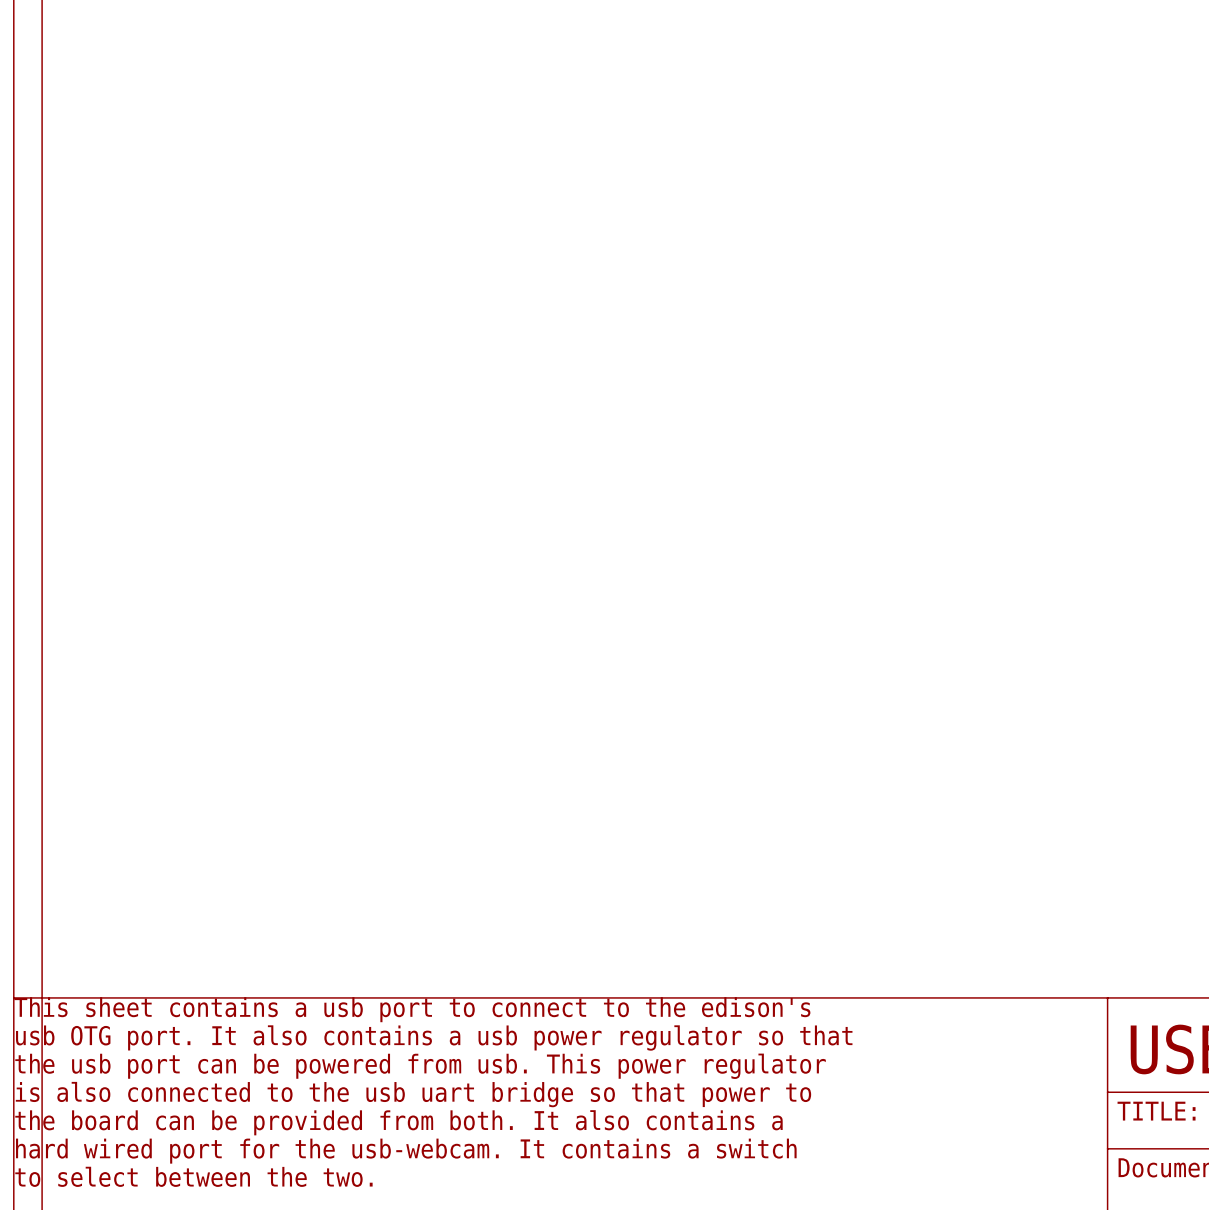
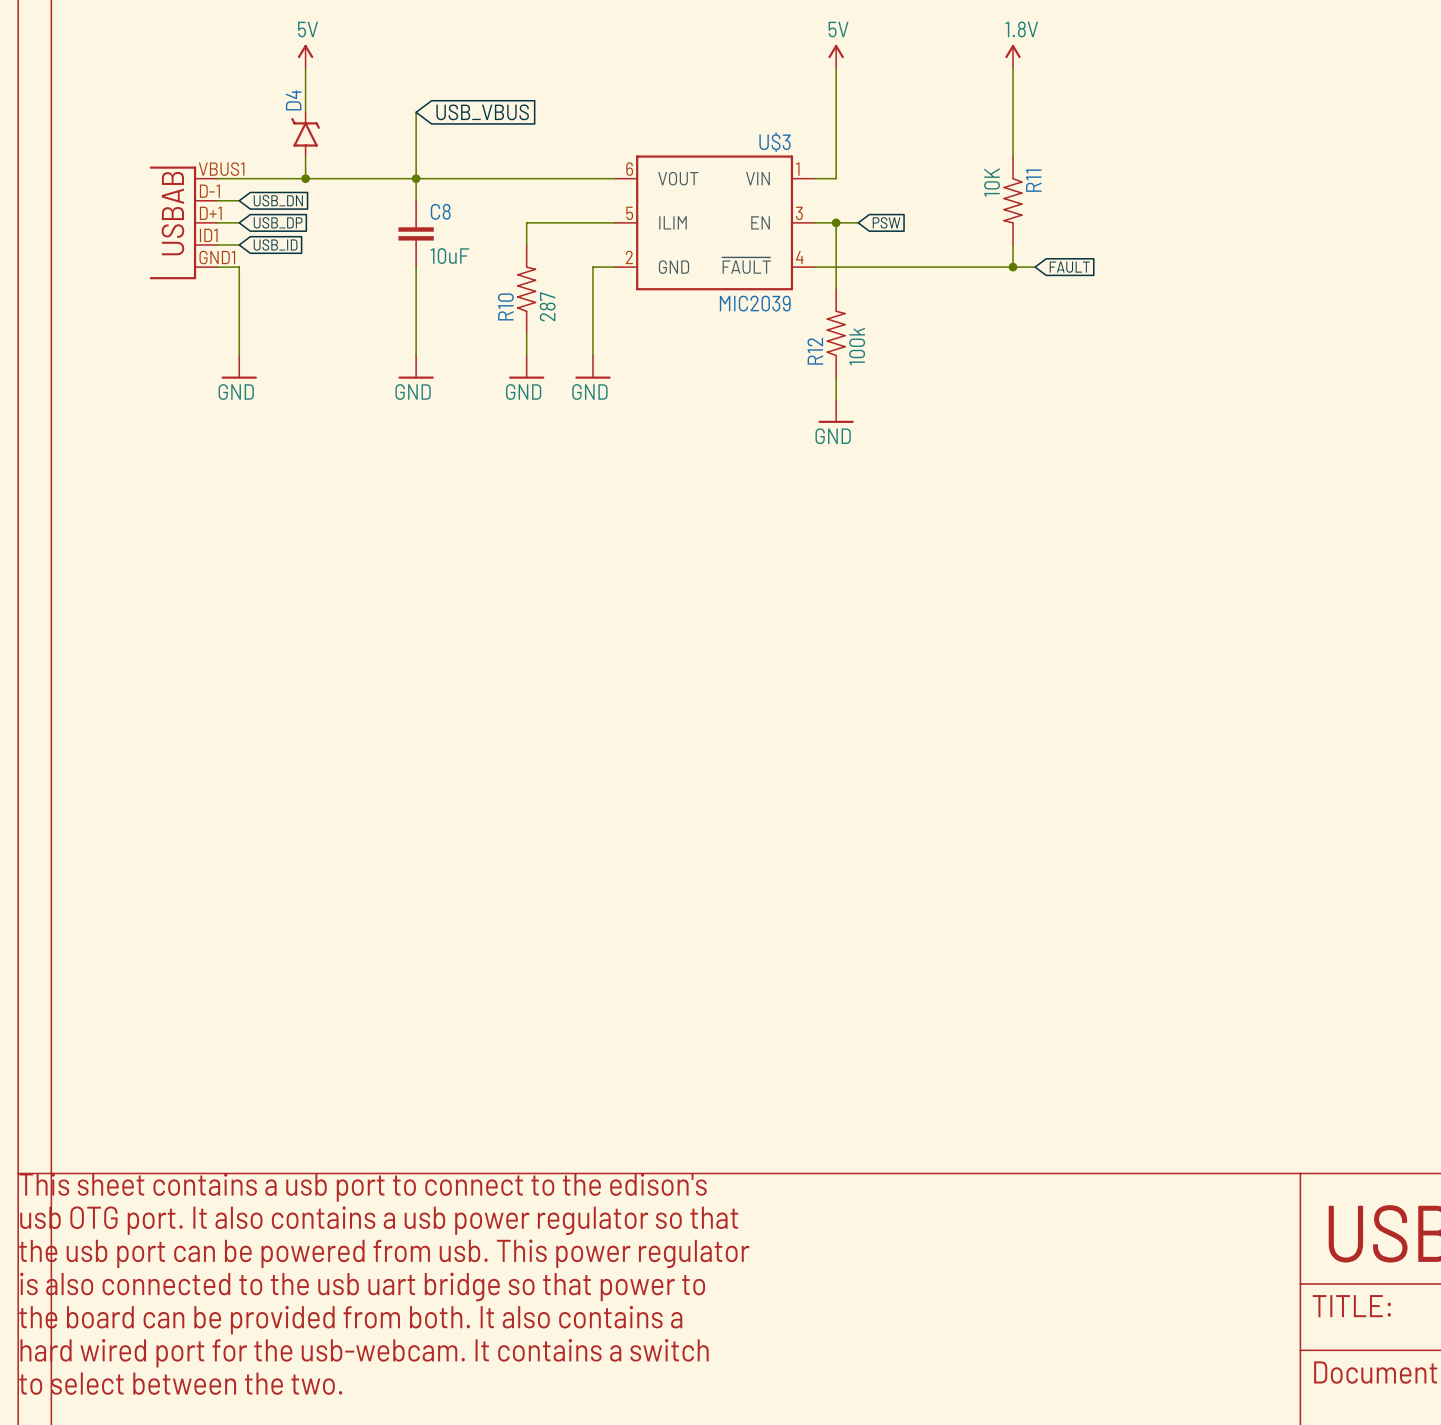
power symbol: none -> 5V (305, 56)
power symbol: none -> 5V (836, 56)
power symbol: none -> 1.8V (1013, 56)
wire: none -> (305, 68) (305, 112)
wire: none -> (836, 68) (836, 178) (814, 178)
wire: none -> (1013, 68) (1013, 156)
wire: none -> (416, 112) (416, 200)
global label: none -> USB_VBUS (482, 112)
D4: none -> (305, 134)
wire: none -> (305, 156) (305, 178)
wire: none -> (217, 178) (615, 178)
junction: none -> (305, 178)
junction: none -> (416, 178)
wire: none -> (217, 200) (239, 200)
R11: none -> 10K (1013, 200)
global label: none -> USB_DN (278, 200)
part: none -> (183, 222)
wire: none -> (217, 222) (239, 222)
wire: none -> (615, 222) (526, 222) (526, 244)
U$3: none -> MIC2039 (714, 222)
wire: none -> (814, 222) (858, 222)
wire: none -> (836, 222) (836, 289)
junction: none -> (836, 222)
global label: none -> PSW (886, 222)
global label: none -> USB_DP (278, 222)
C8: none -> 10uF (416, 233)
wire: none -> (217, 244) (239, 244)
wire: none -> (1013, 244) (1013, 267)
global label: none -> USB_ID (275, 244)
wire: none -> (217, 267) (239, 267) (239, 355)
wire: none -> (416, 267) (416, 355)
wire: none -> (615, 267) (592, 267) (592, 355)
wire: none -> (814, 267) (1035, 267)
junction: none -> (1013, 267)
global label: none -> FAULT (1069, 267)
R10: none -> 287 (526, 289)
wire: none -> (526, 333) (526, 355)
R12: none -> 100k (836, 333)
power symbol: none -> GND (239, 367)
power symbol: none -> GND (416, 367)
power symbol: none -> GND (526, 367)
power symbol: none -> GND (592, 367)
wire: none -> (836, 377) (836, 399)
power symbol: none -> GND (836, 411)

